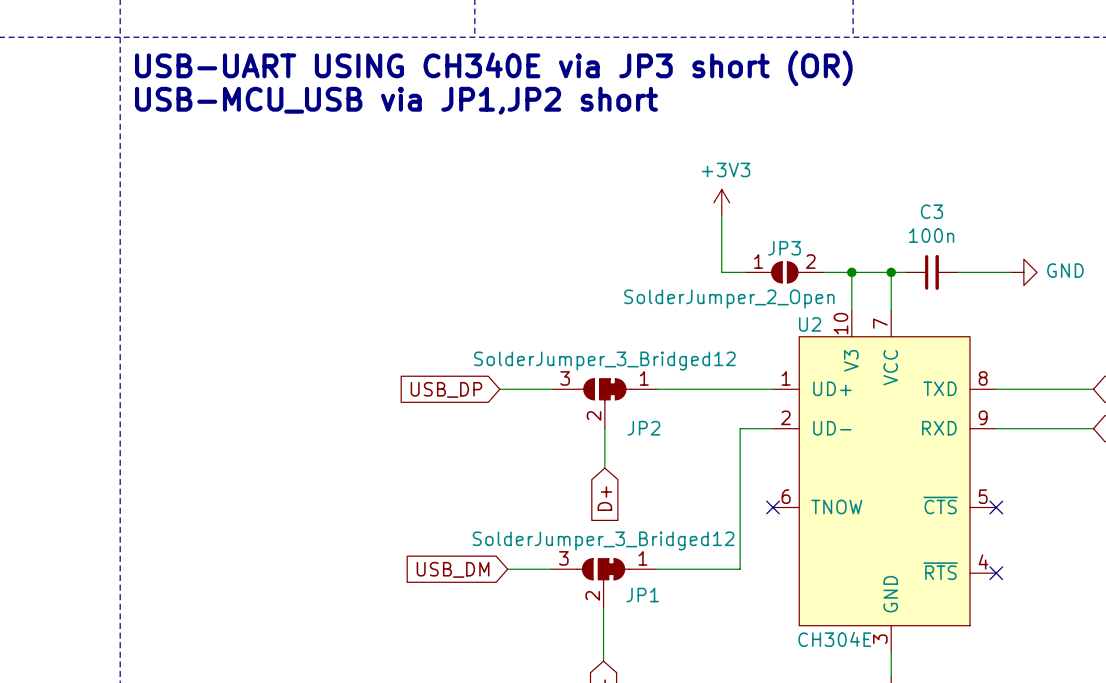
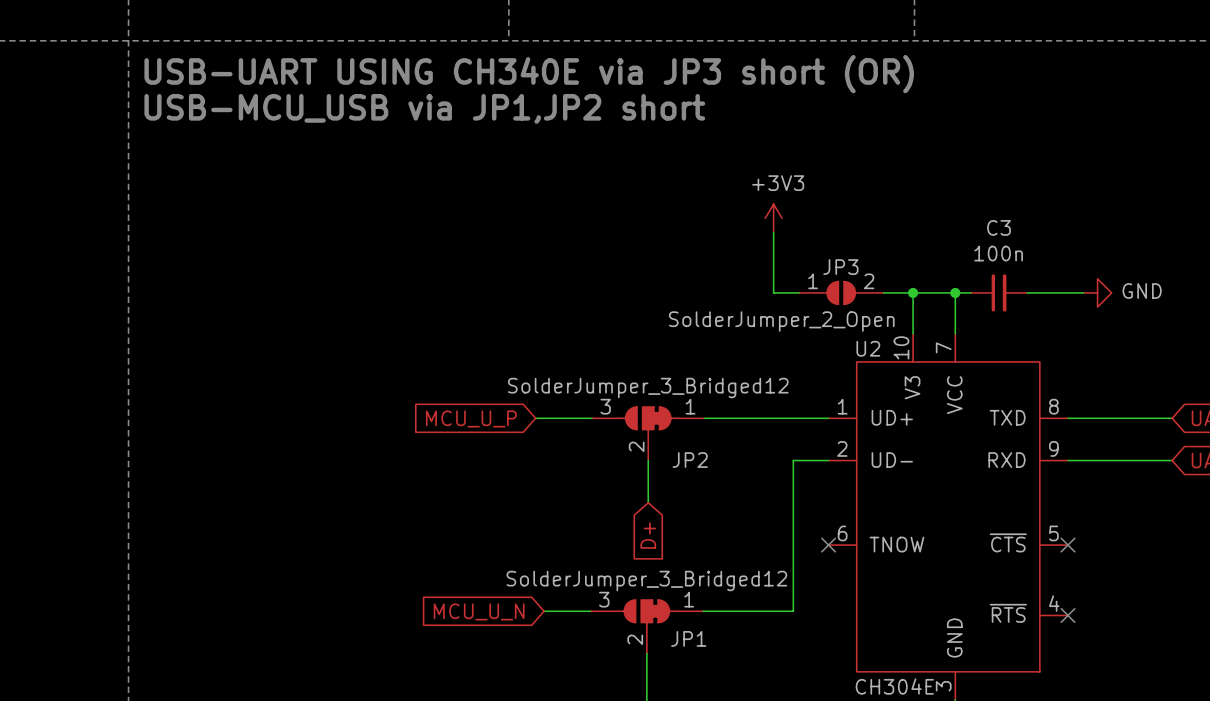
global label: USB_DP (446, 389) -> MCU_U_P (471, 418)
global label: USB_DM (453, 569) -> MCU_U_N (479, 611)

